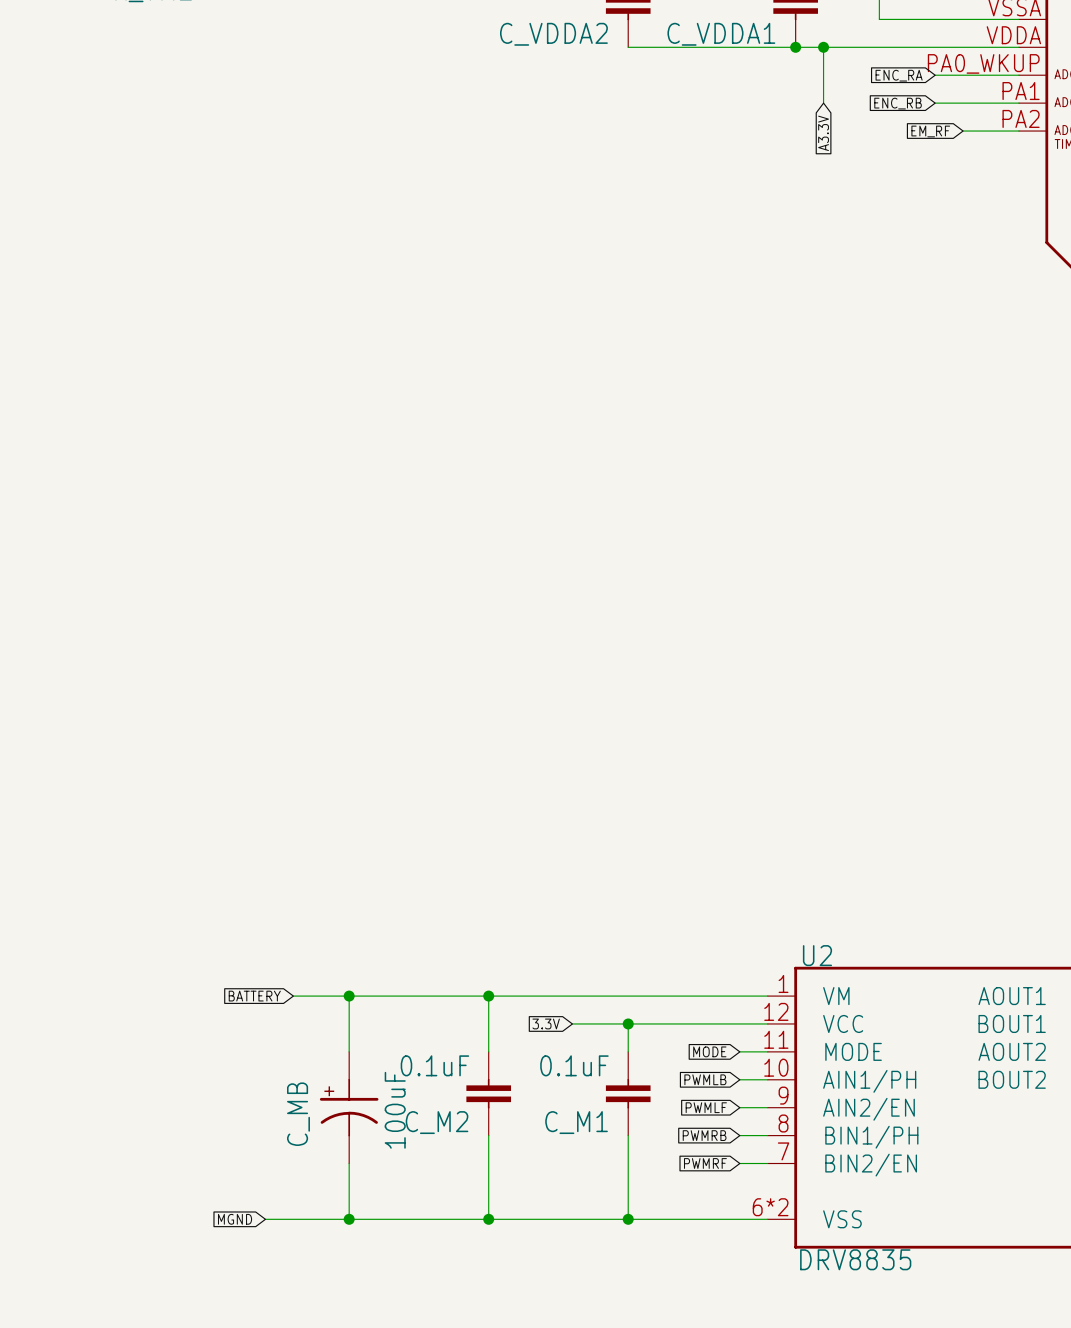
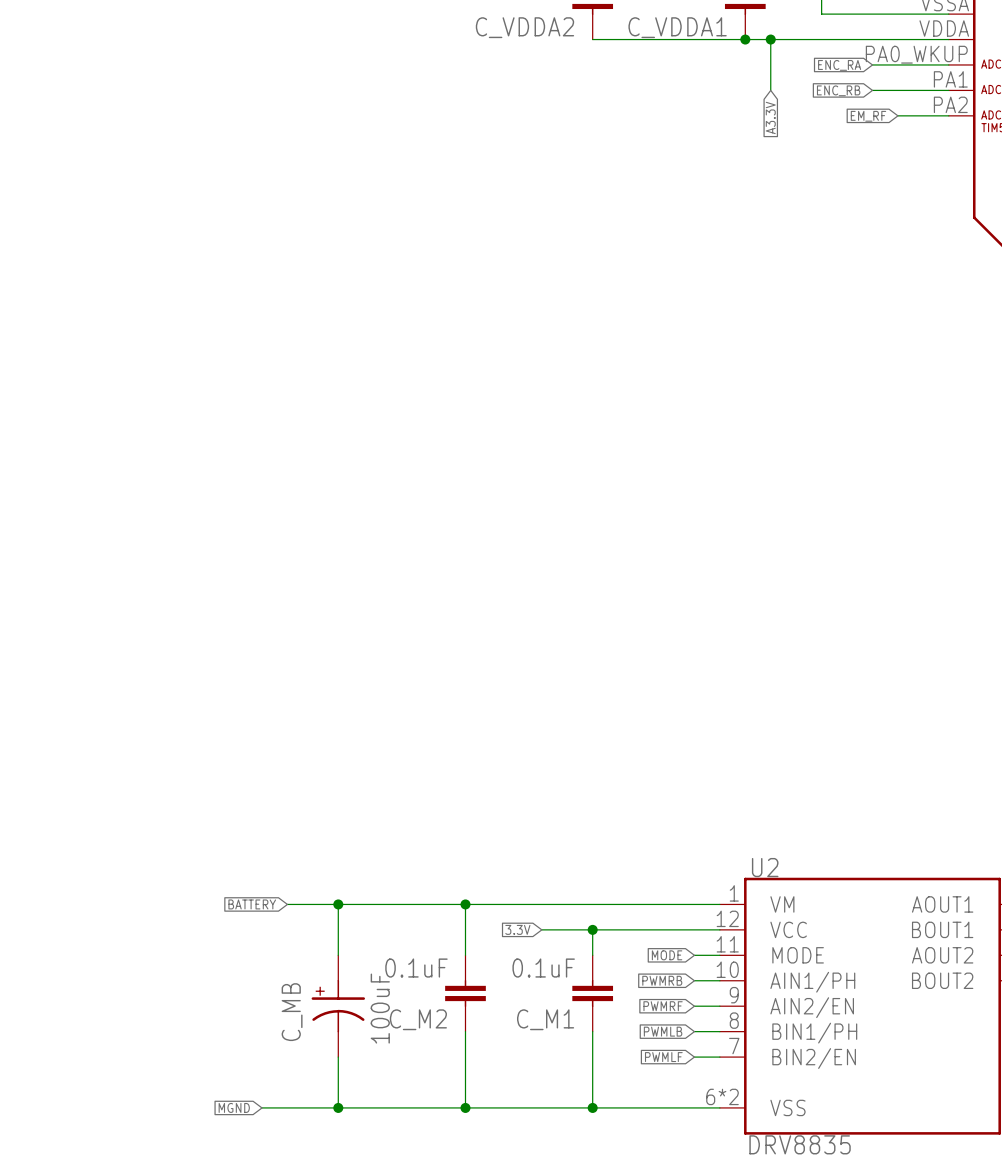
global label: PWMLB (705, 1079) -> PWMRB (662, 980)
global label: PWMLF (706, 1107) -> PWMRF (663, 1006)
global label: PWMRB (704, 1135) -> PWMLB (663, 1031)
global label: PWMRF (705, 1163) -> PWMLF (663, 1057)

